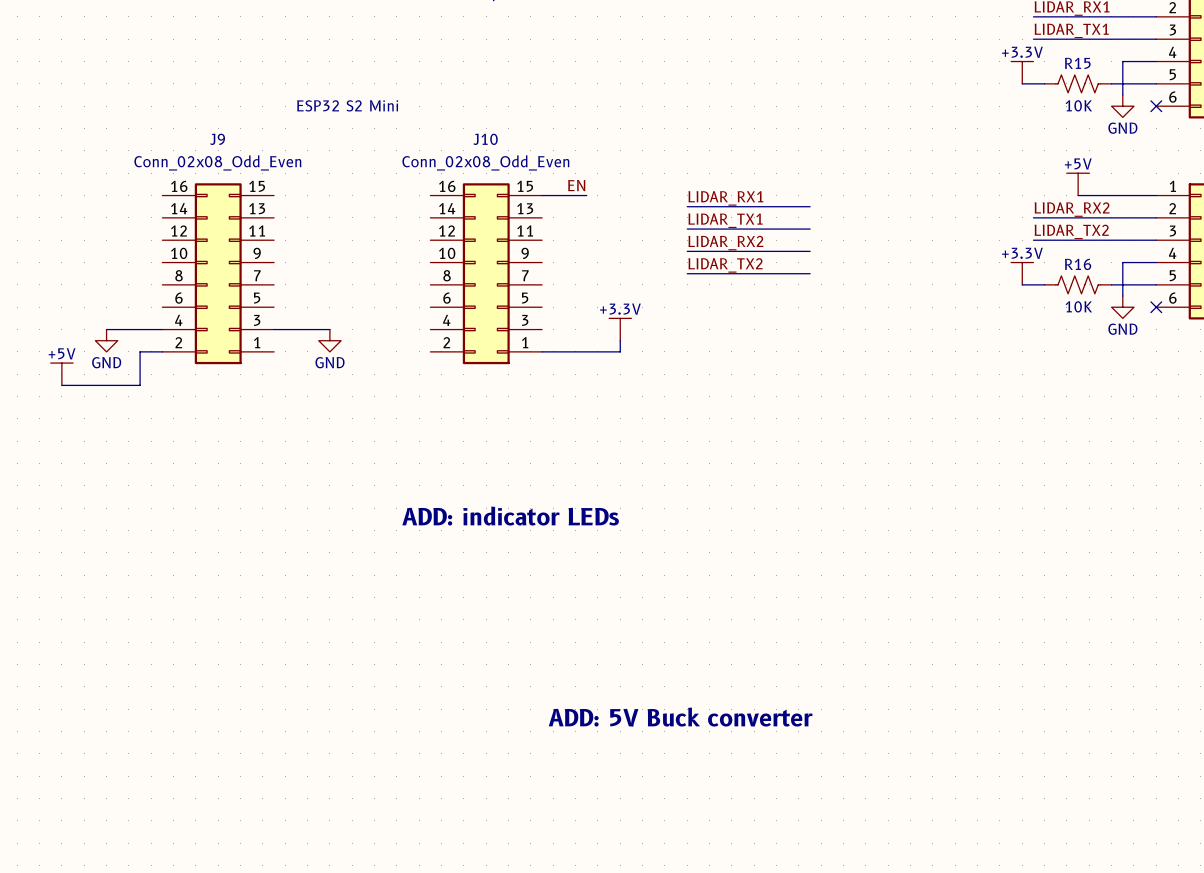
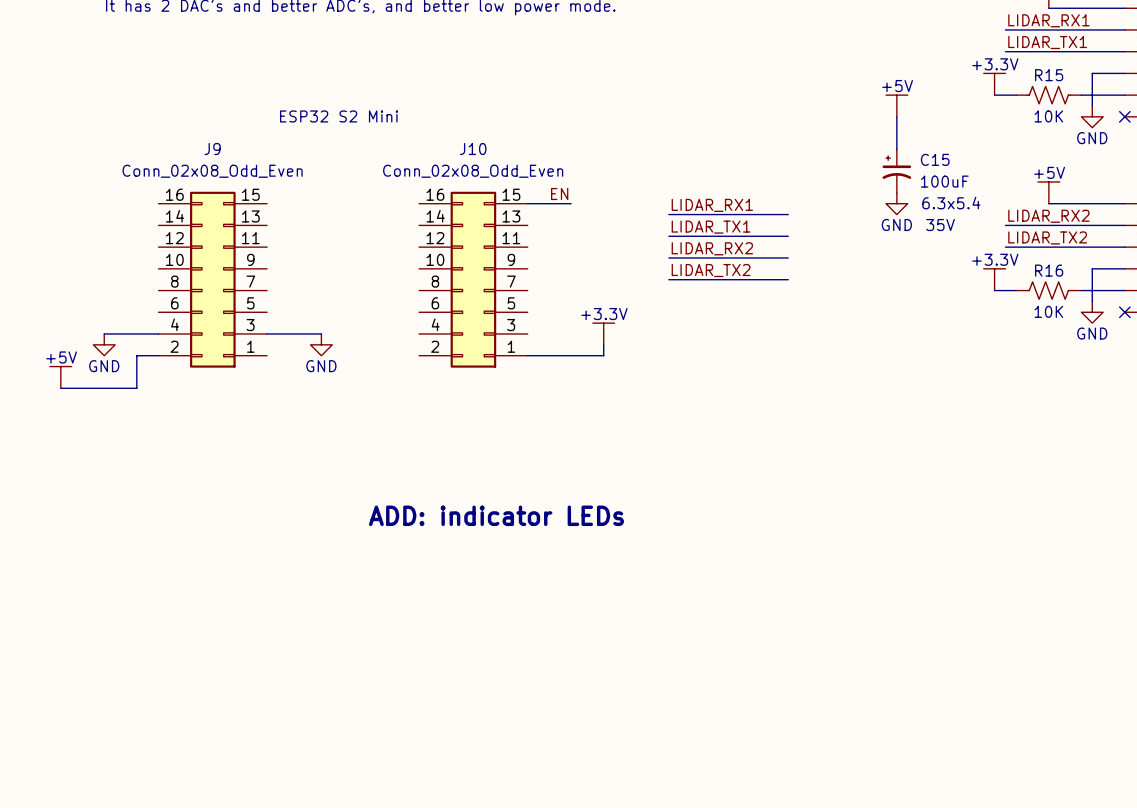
power symbol: none -> +5V (896, 105)
wire: none -> (896, 116) (896, 149)
C15: none -> 100uF (896, 171)
power symbol: none -> GND (896, 203)
text: ADD: 5V Buck converter (680, 717) -> none

